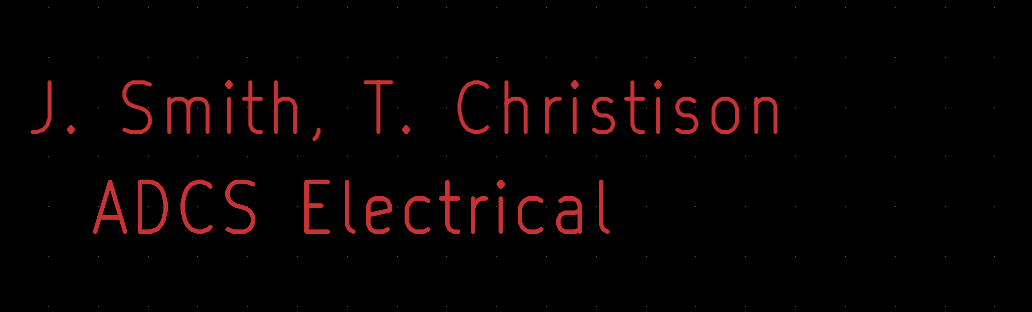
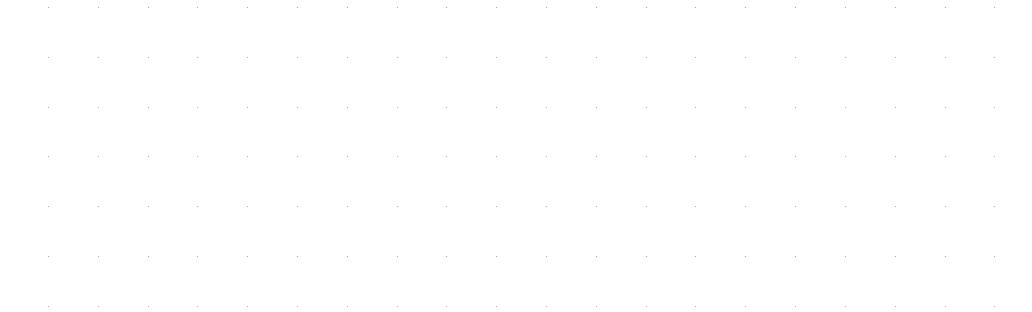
text: J. Smith, T. Christison (403, 110) -> none
text: ADCS Electrical (351, 206) -> none

